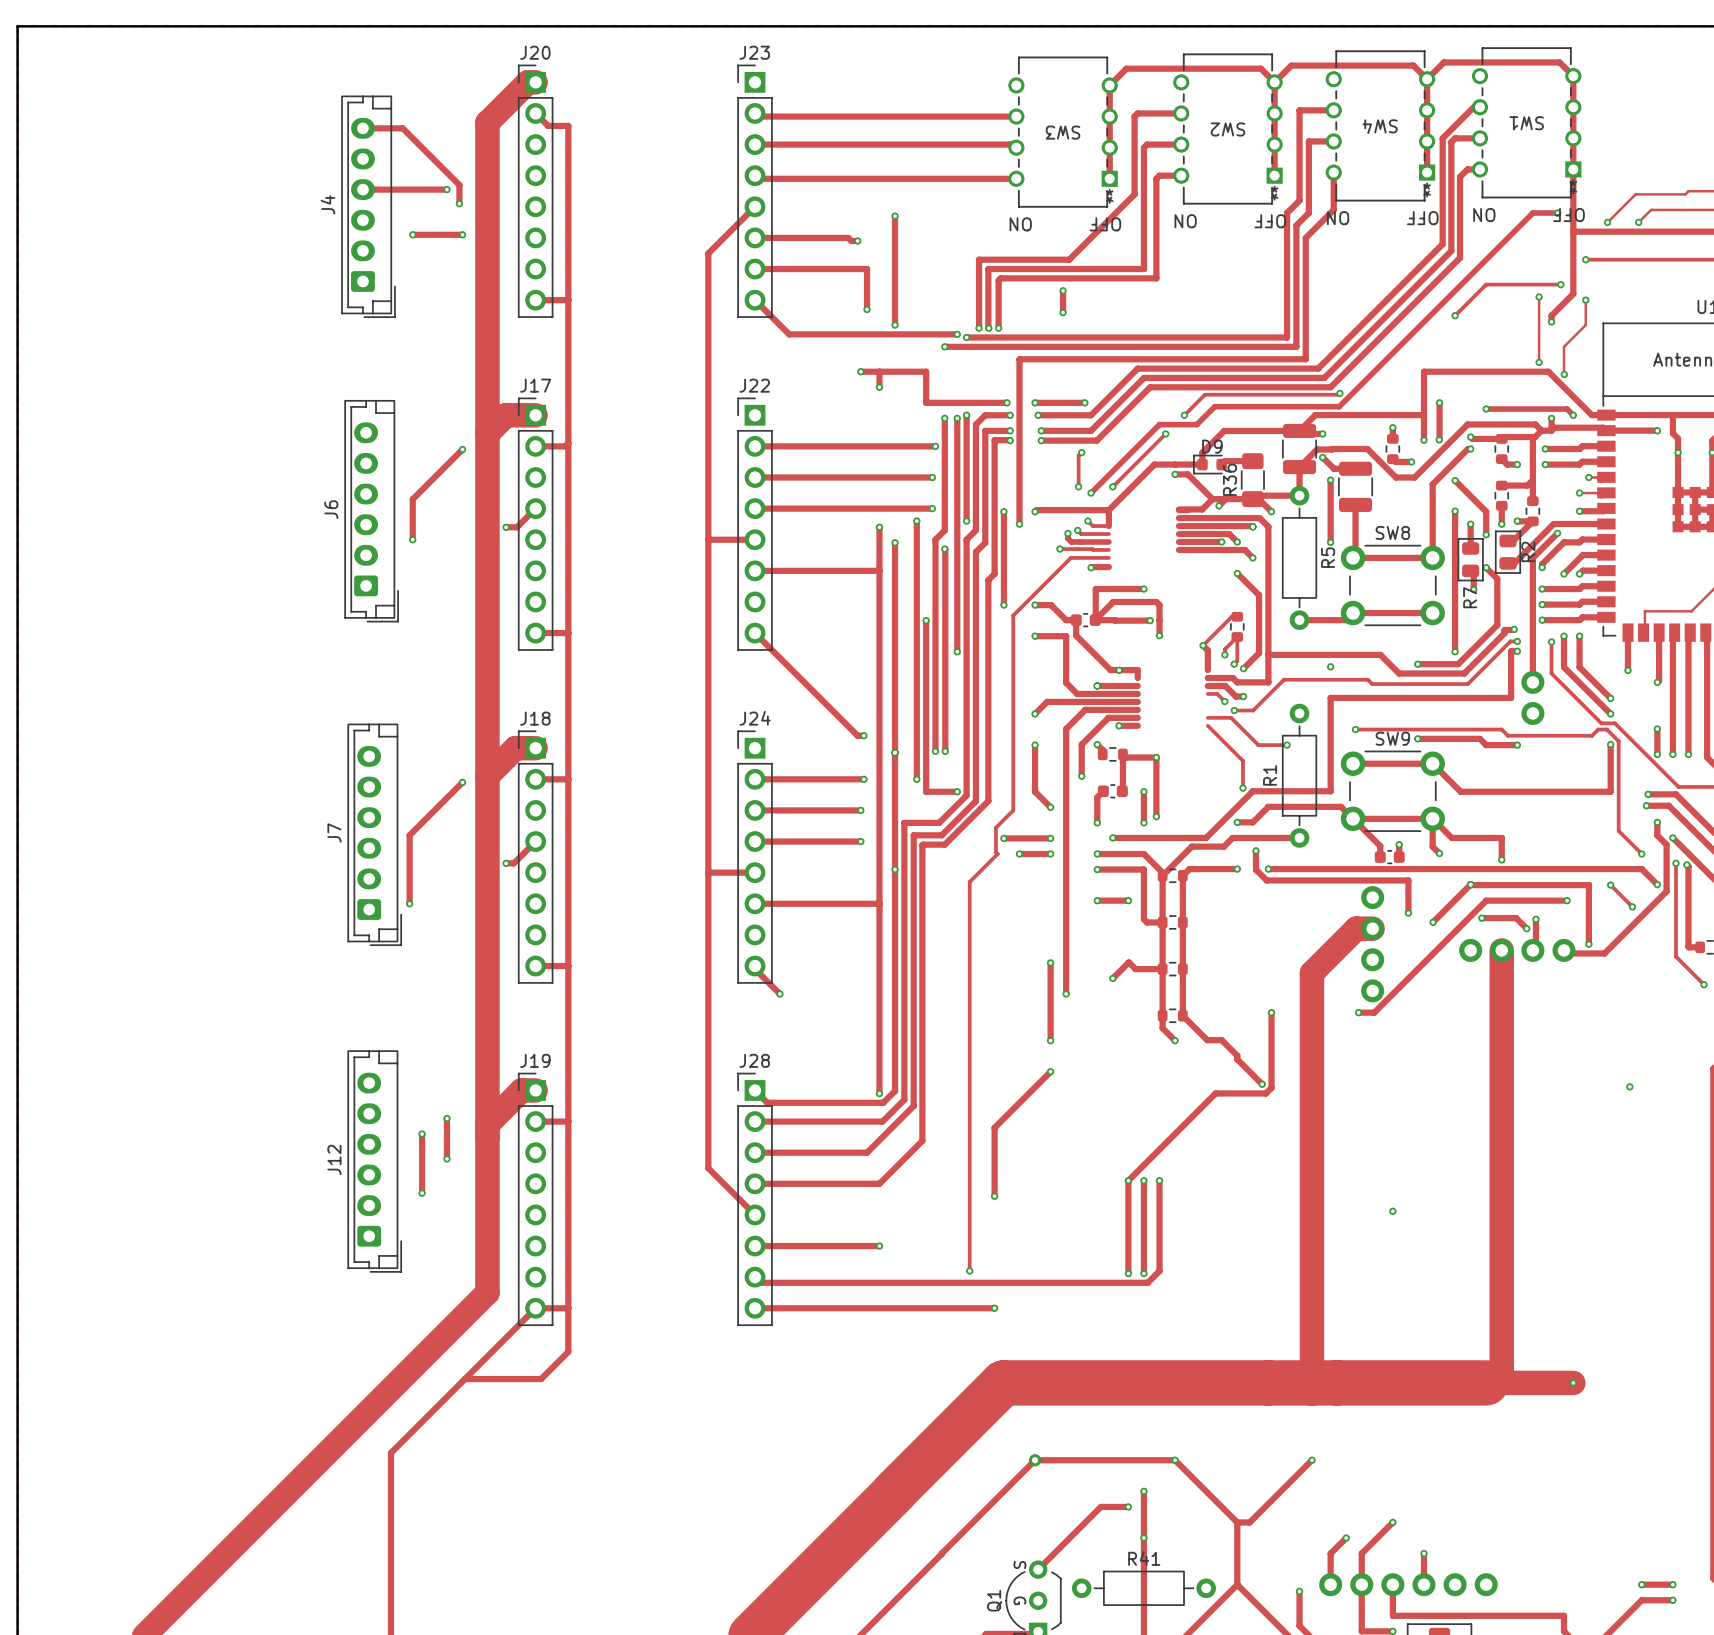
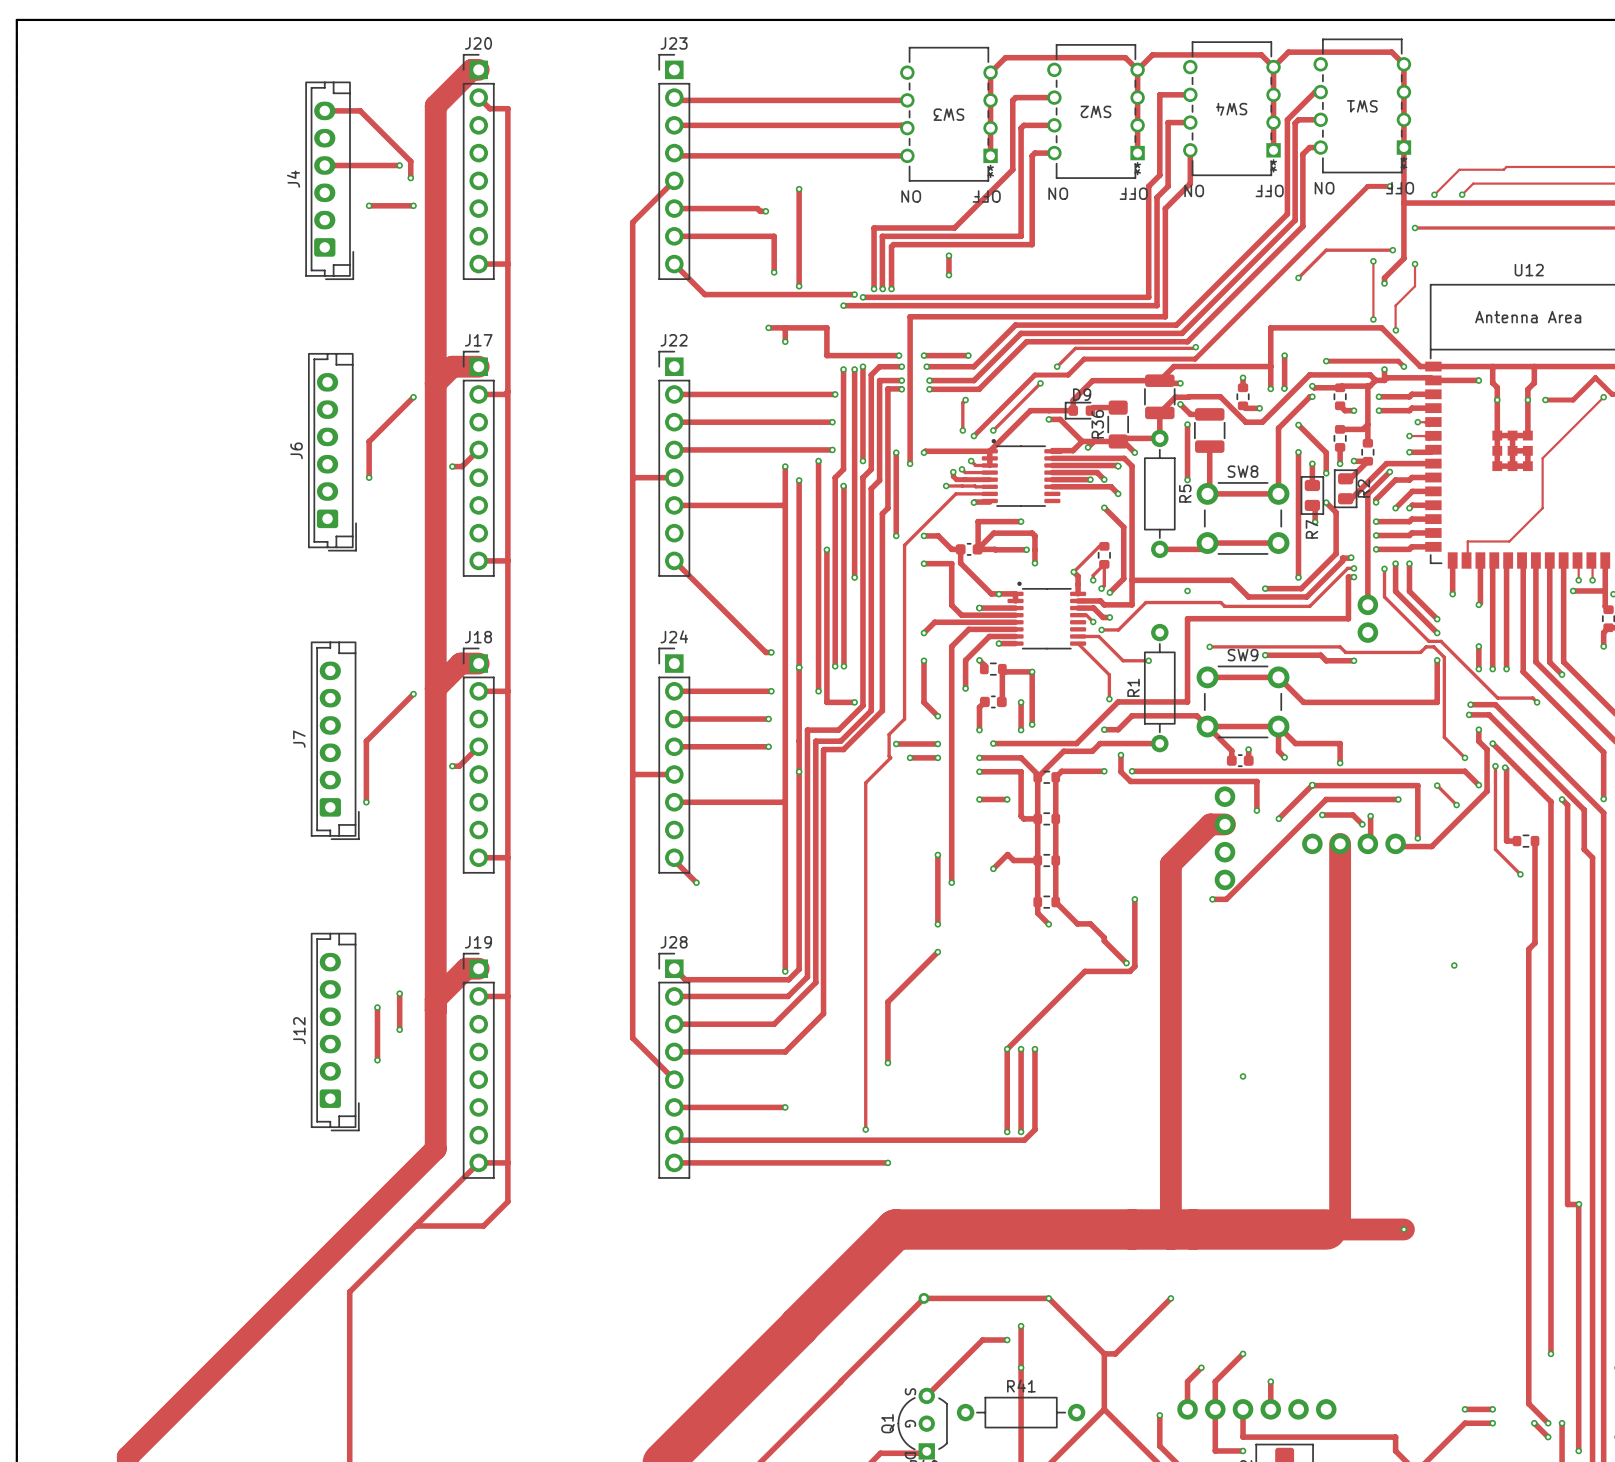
part: none -> (1021, 472)
part: none -> (1046, 615)

